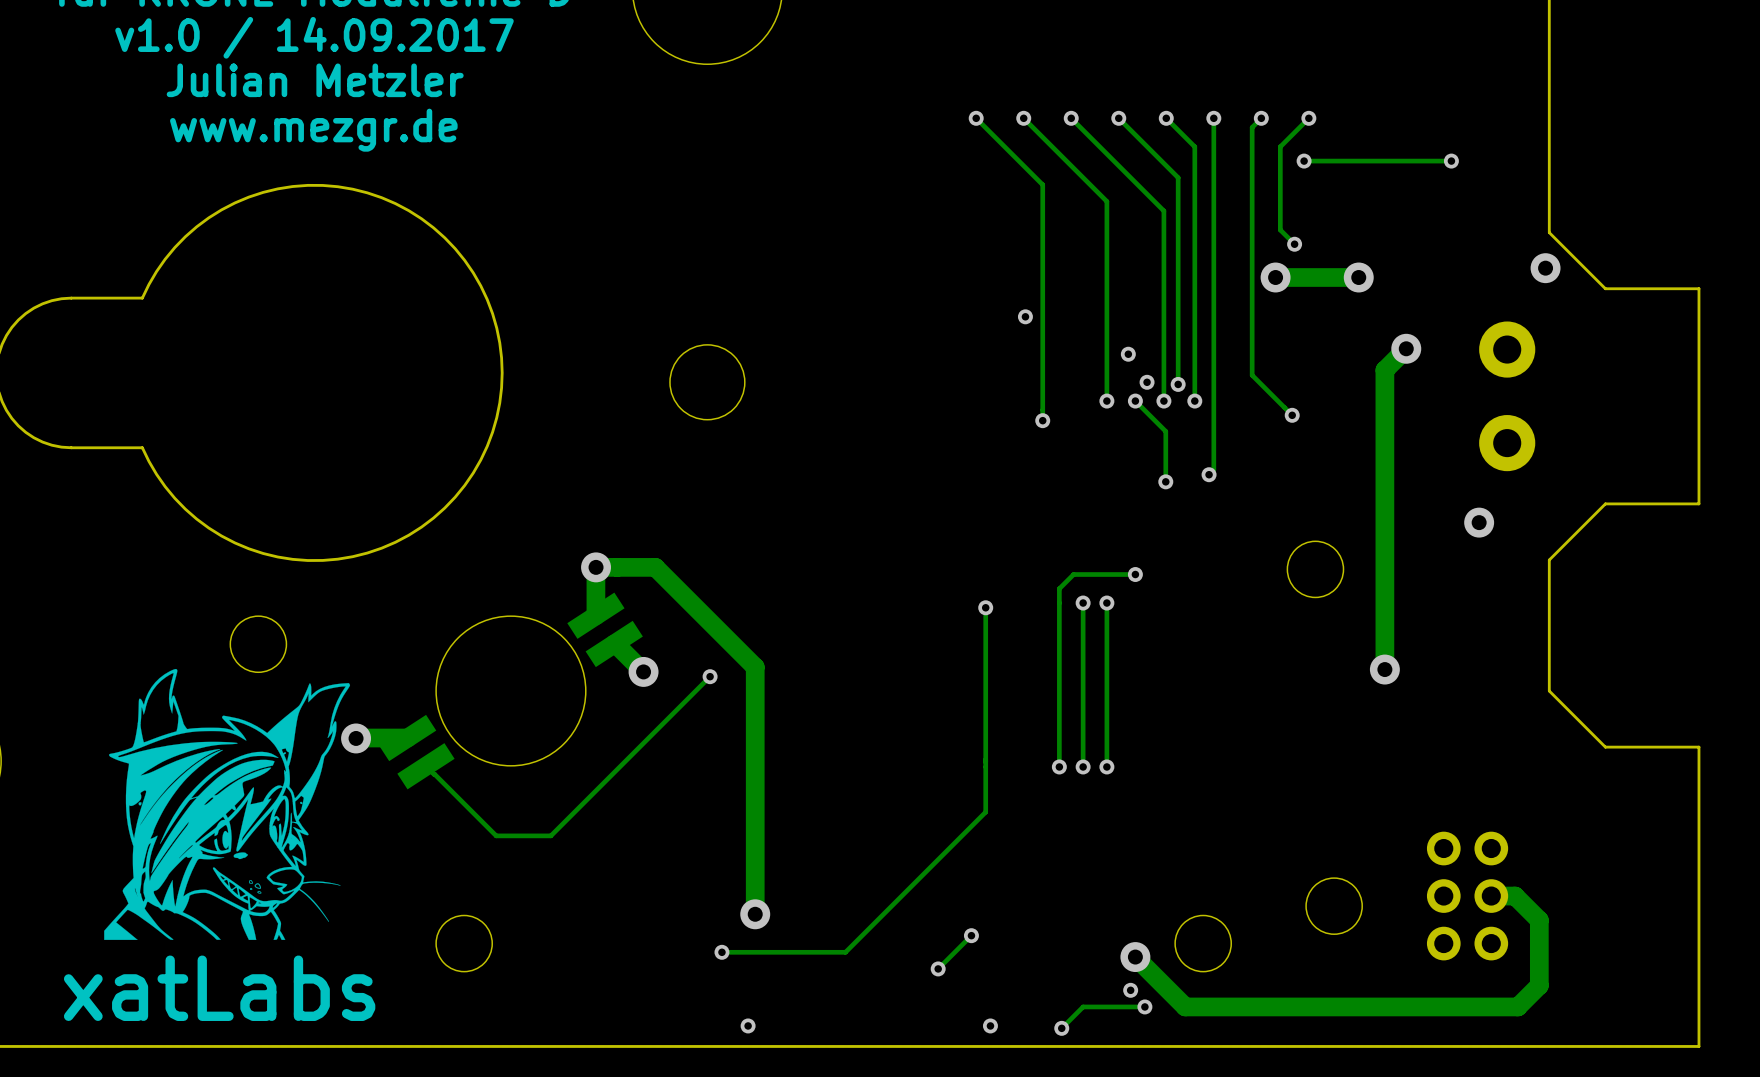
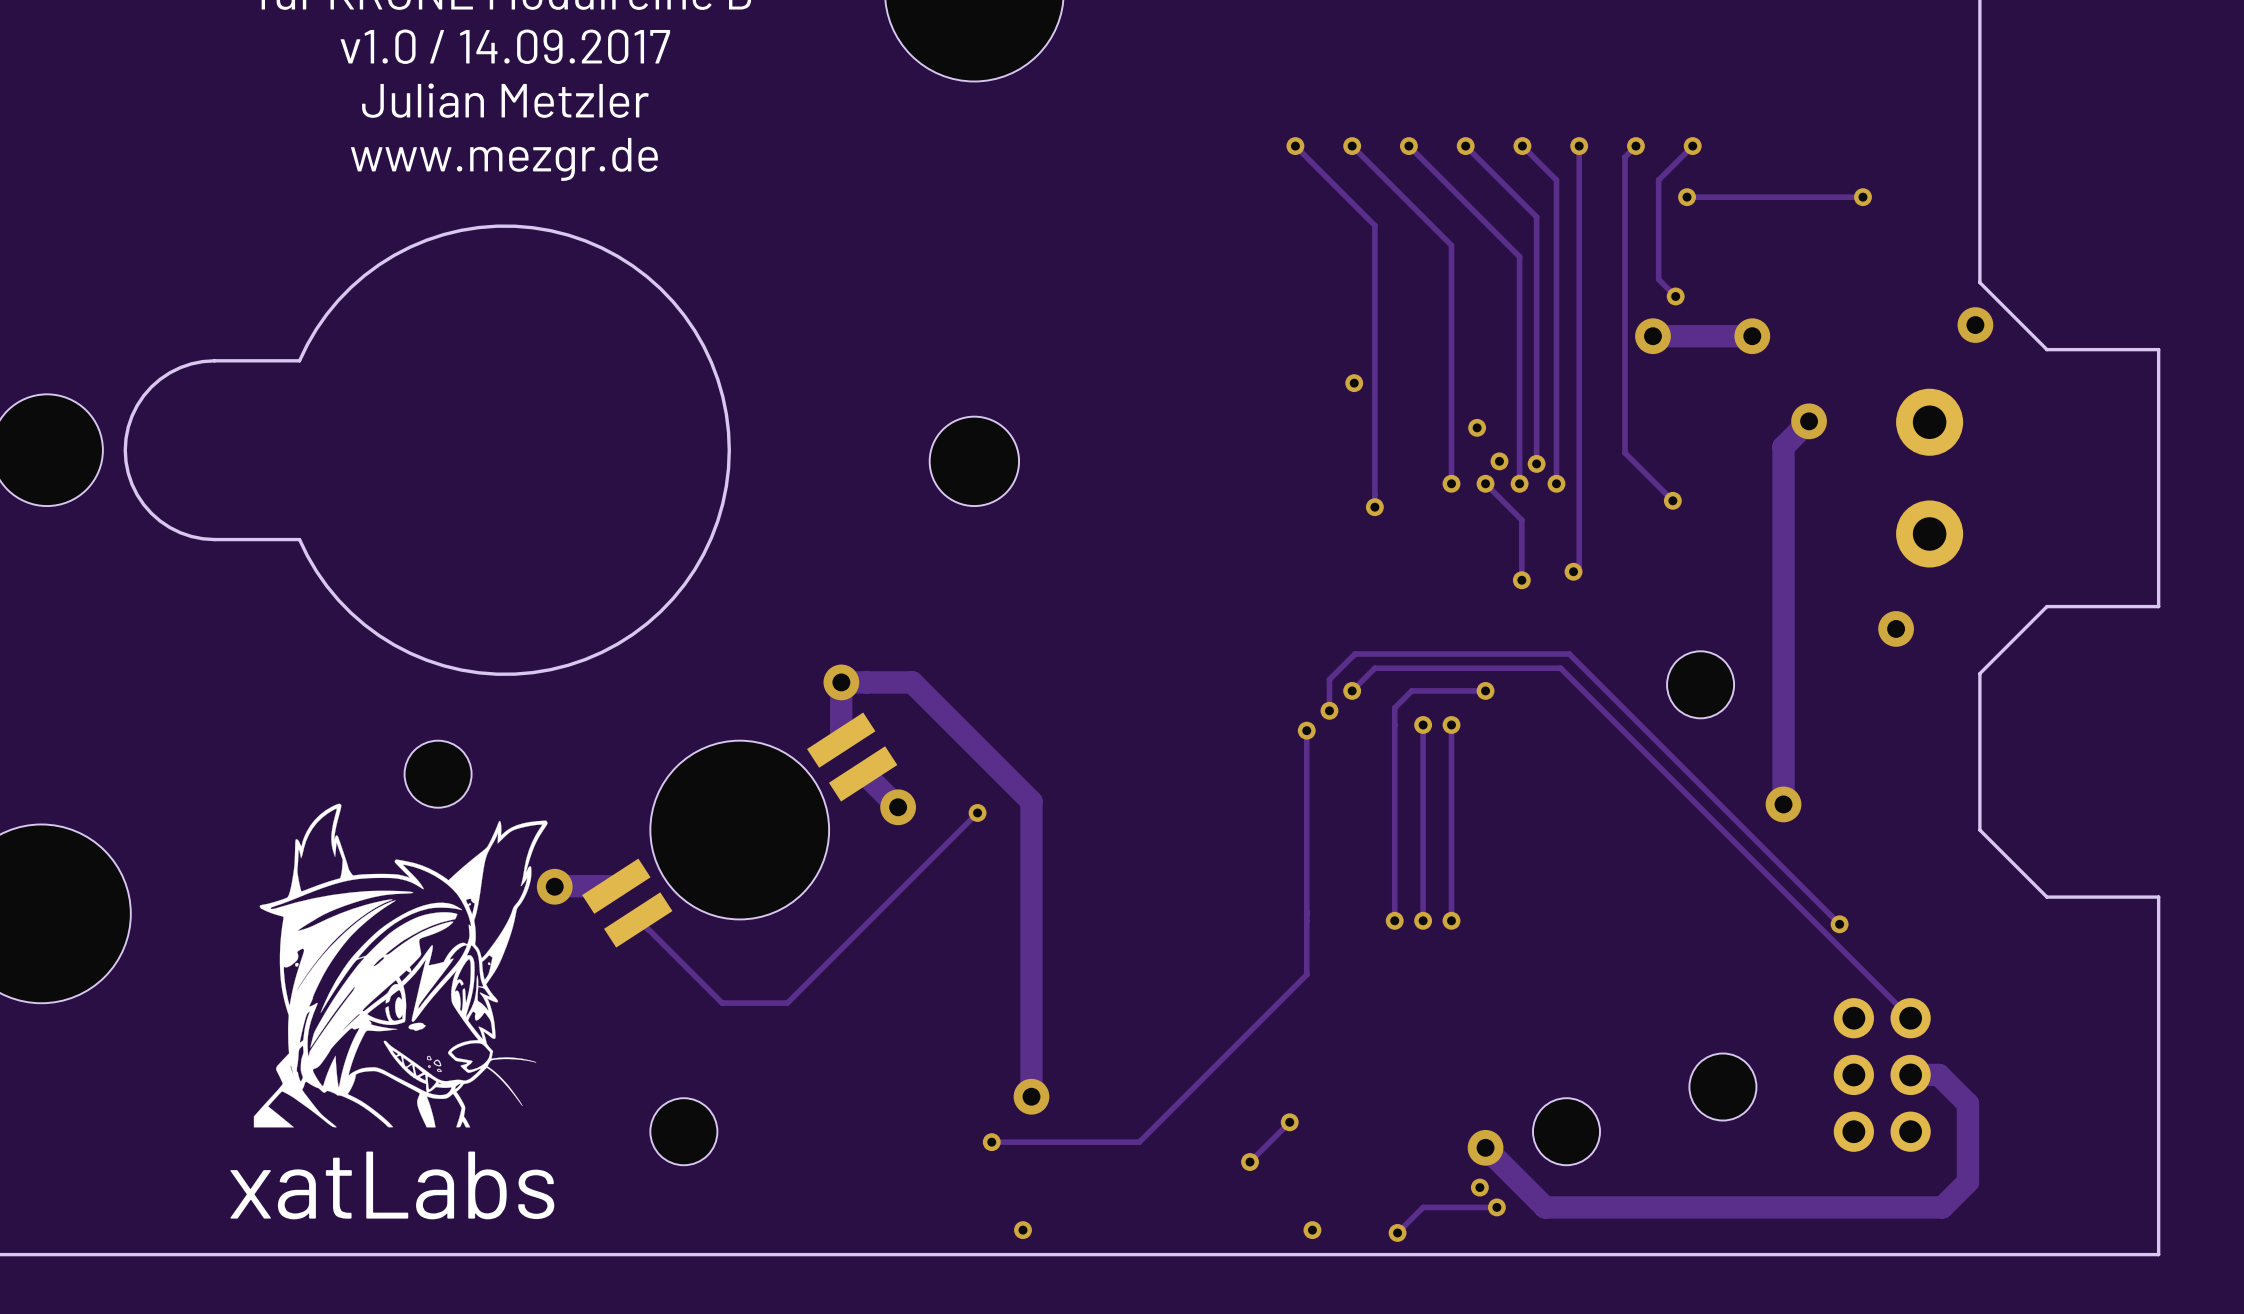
track: none -> (1352, 690) (1374, 668) (1560, 668) (1910, 1018)
via: none -> (1352, 690)
track: none -> (1329, 710) (1329, 679) (1355, 654) (1569, 654) (1839, 924)
via: none -> (1329, 710)
via: none -> (1839, 924)

